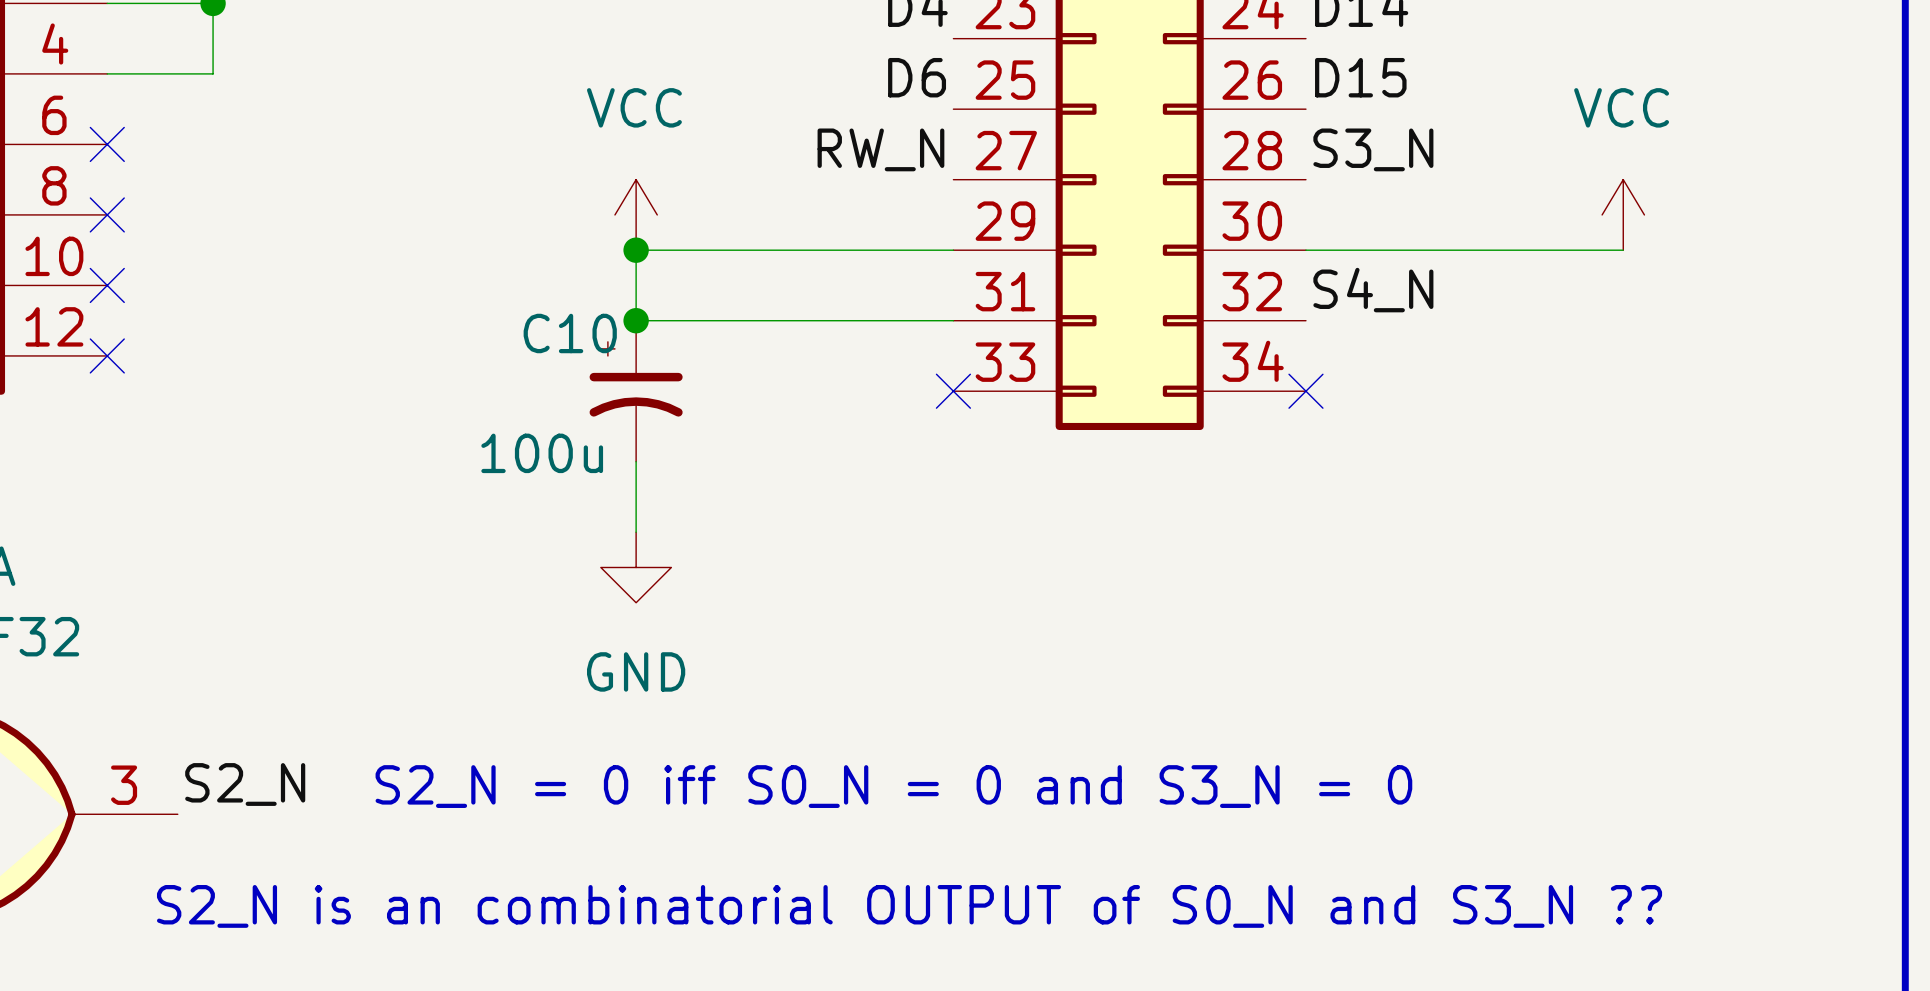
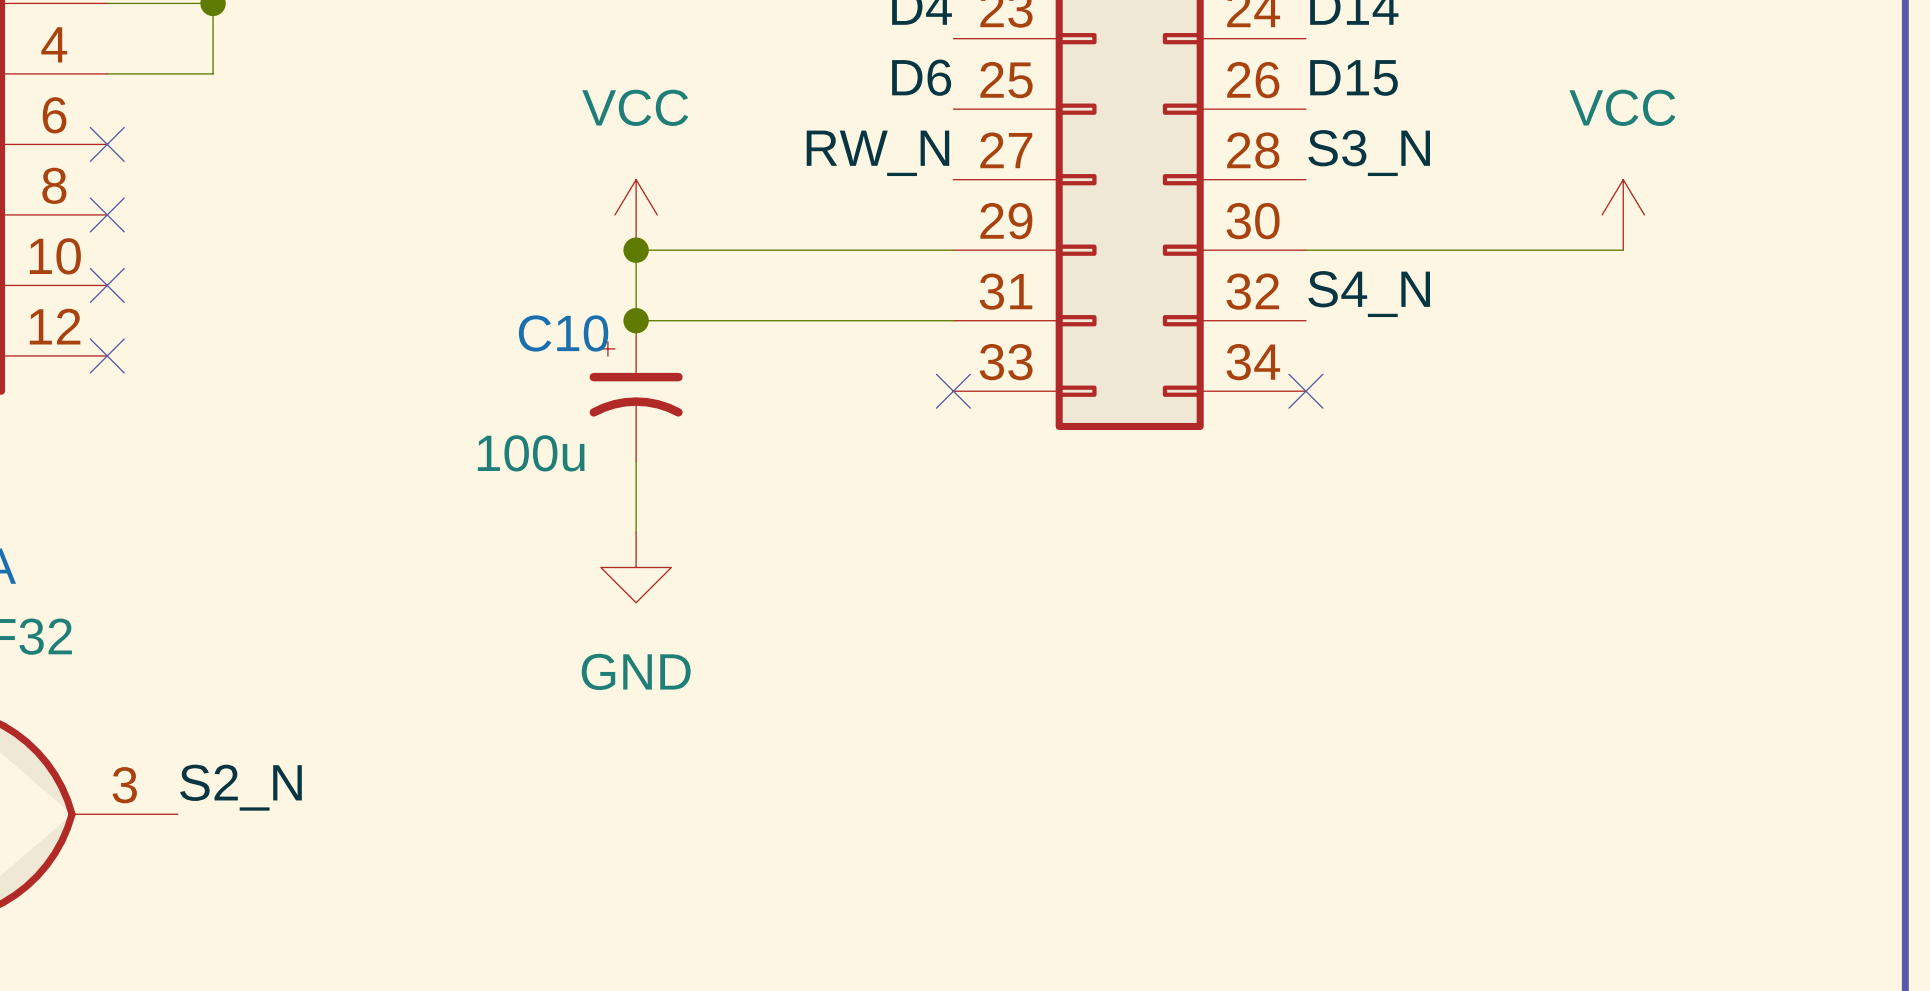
text: S2_N = 0 iff S0_N = 0 and S3_N = 0 (893, 786) -> none
text: S2_N is an combinatorial OUTPUT of S0_N and S3_N ?? (909, 906) -> none

